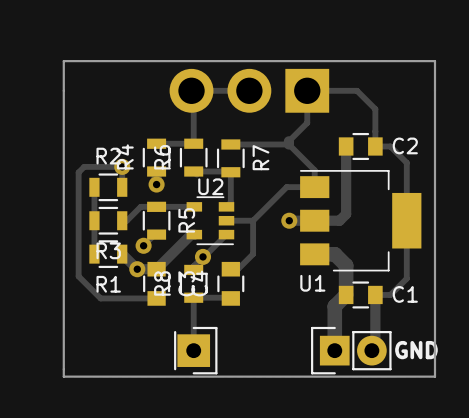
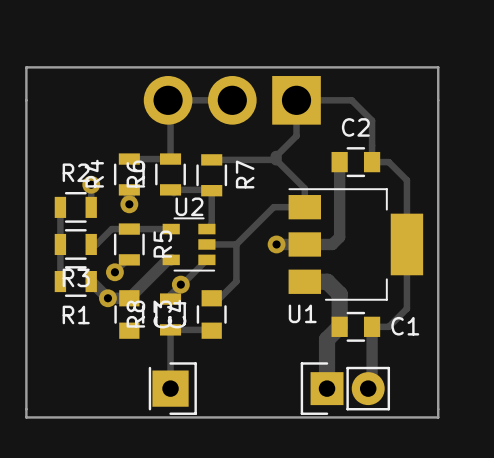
C2 name position: C2 (405, 145) -> C2 (355, 127)
track: (122, 166) (84, 166) (78, 172) (78, 276) (100, 298) (156, 298) -> none
text: GND (416, 350) -> none

